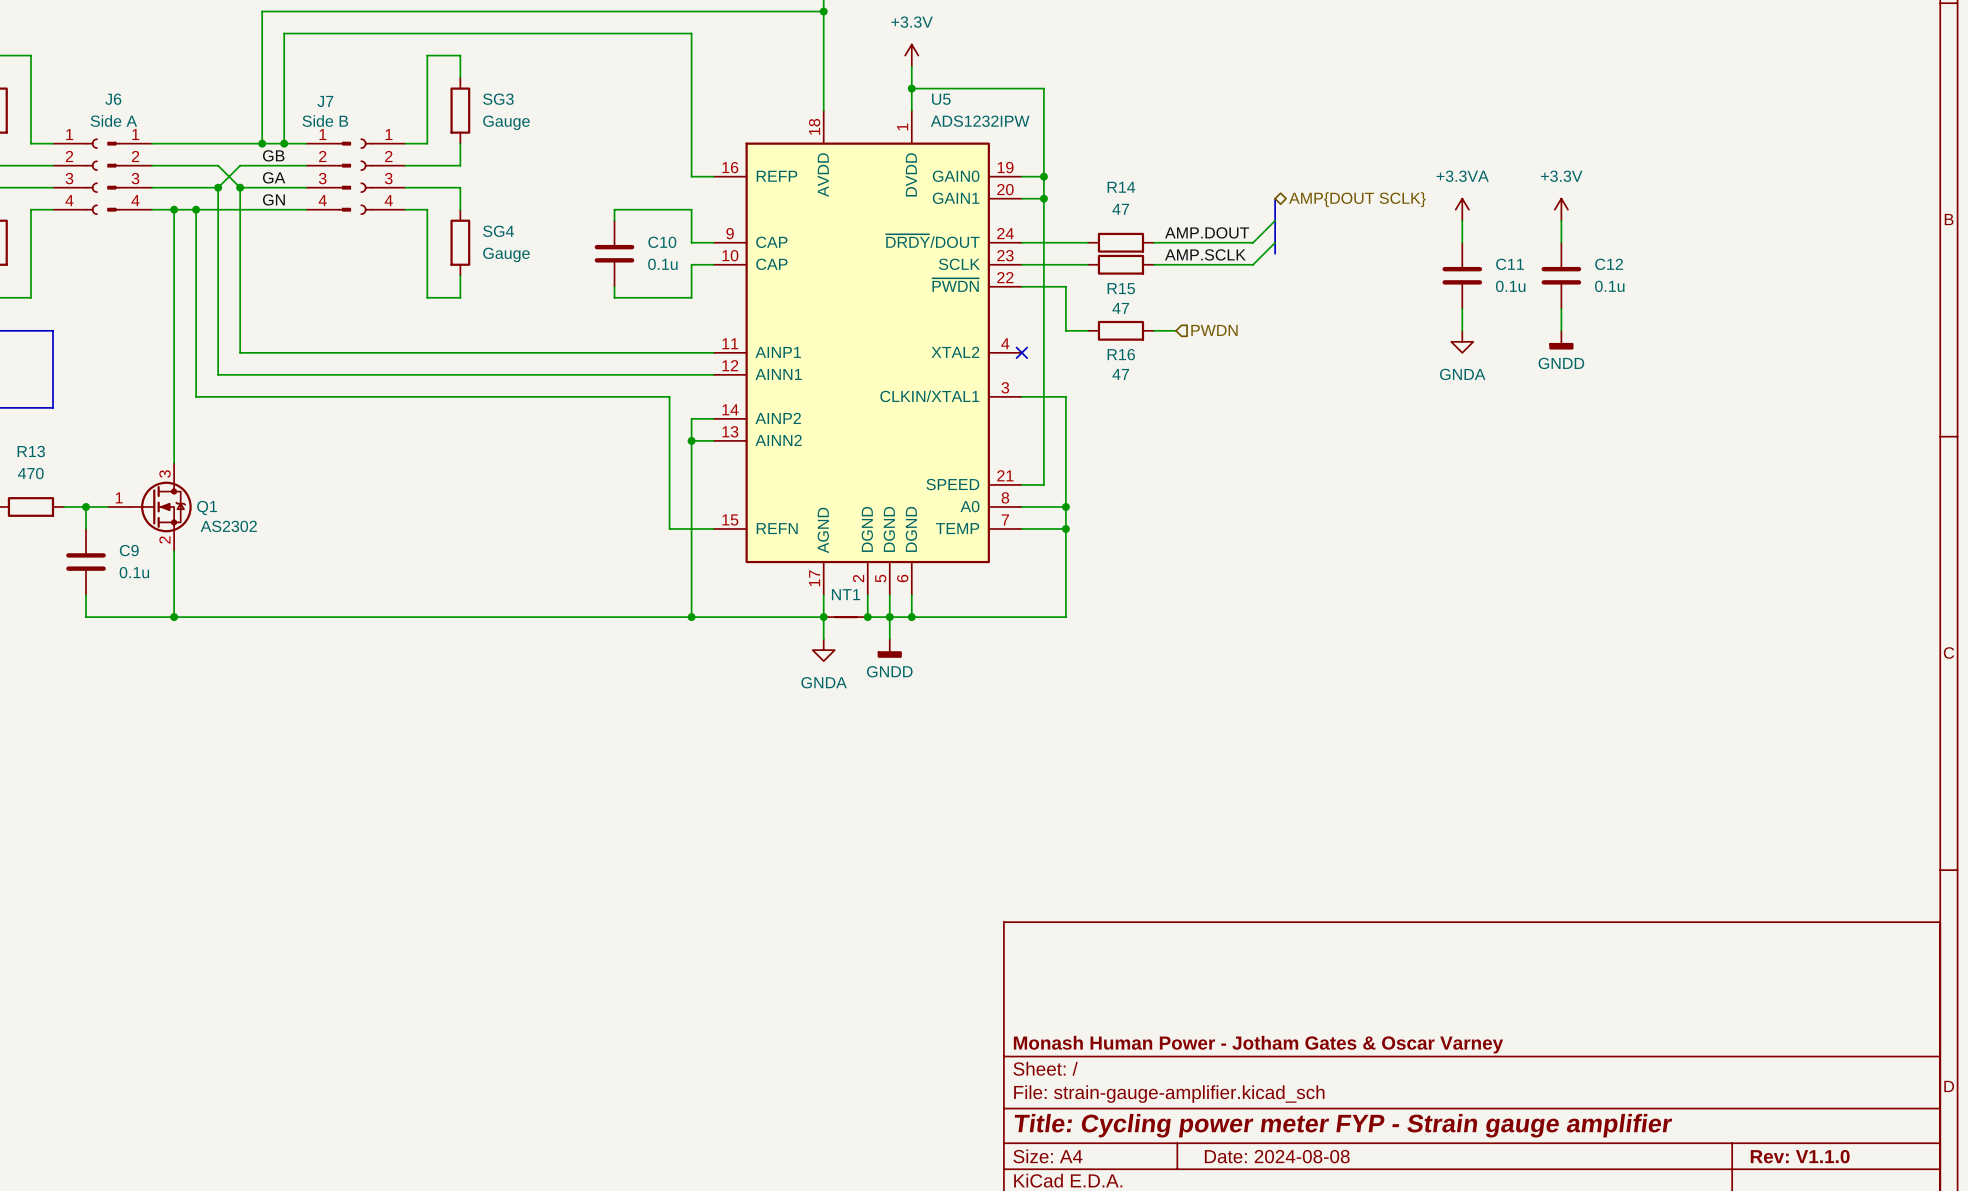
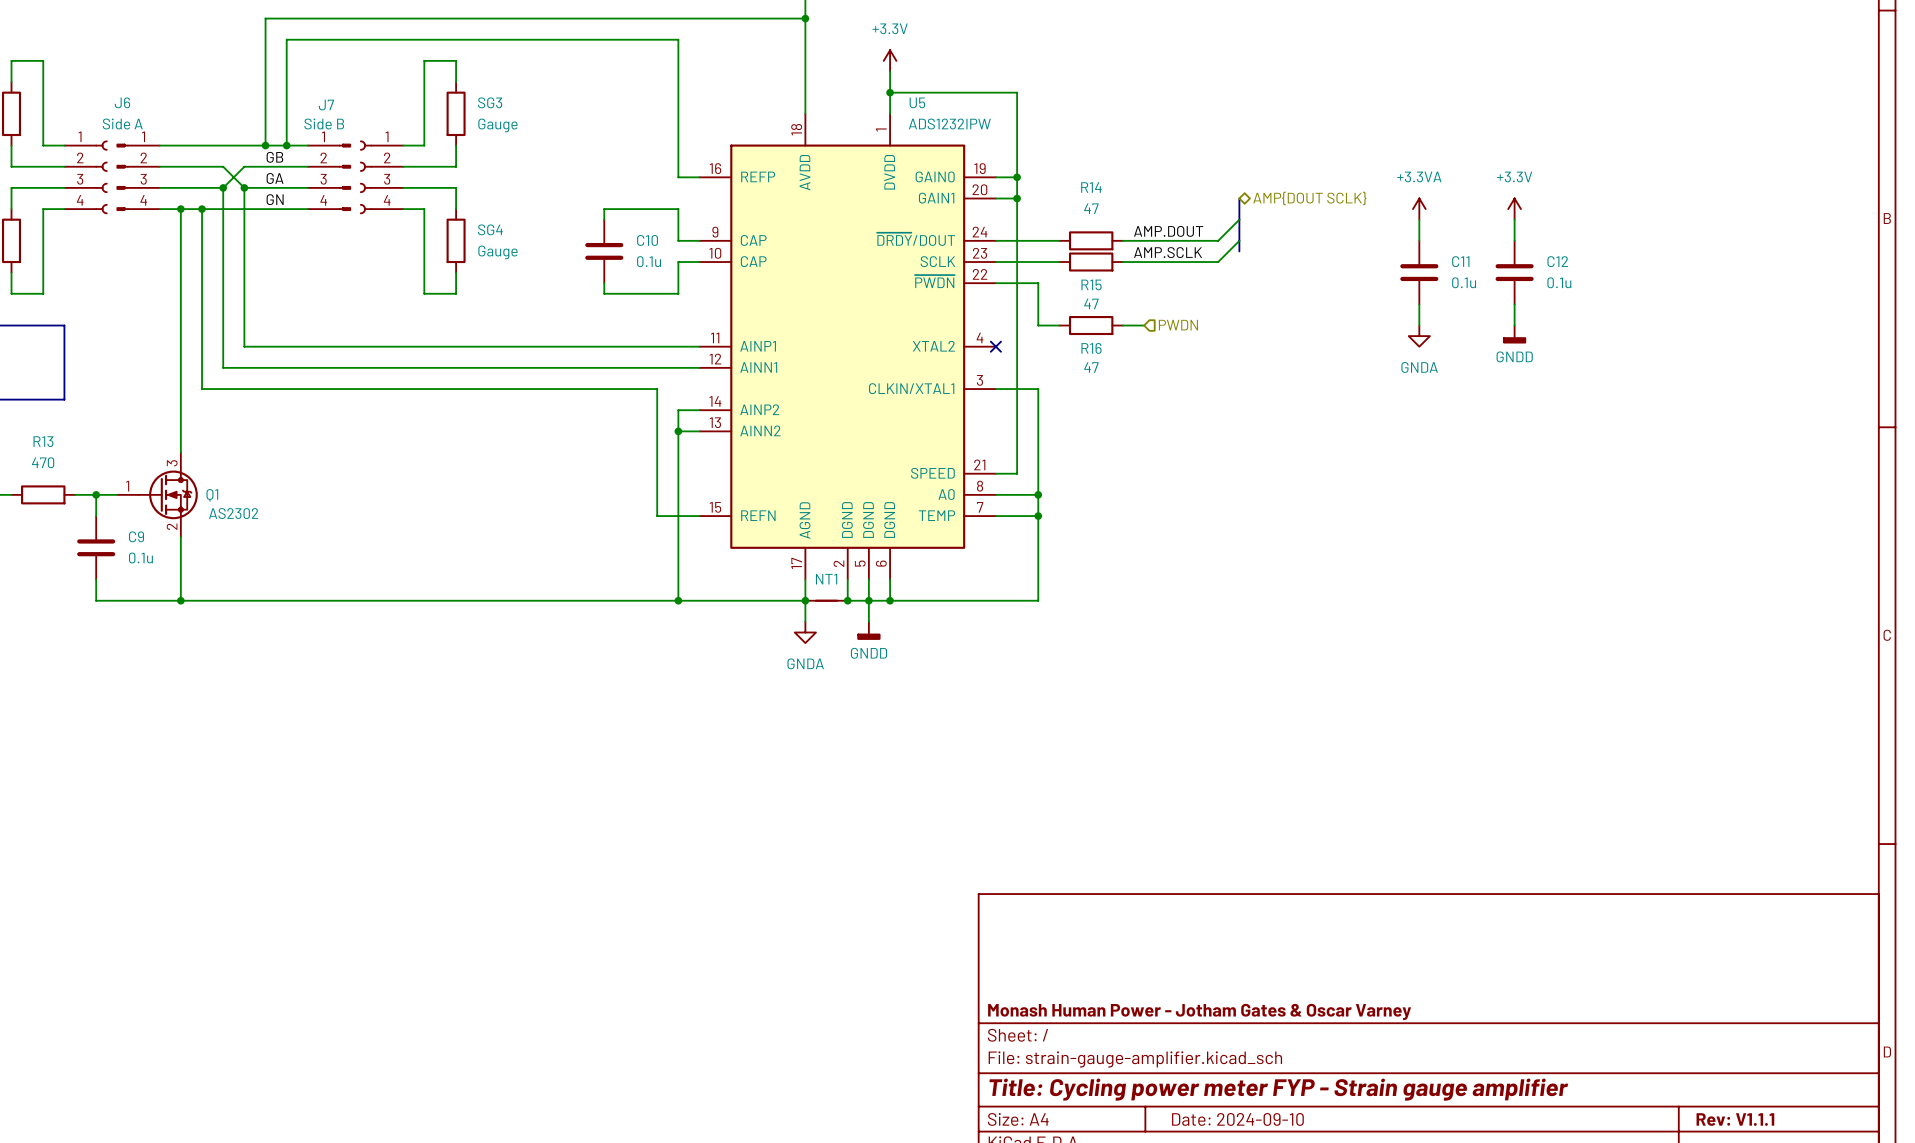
title block: Date: 2024-08-08 (1277, 1156) -> Date: 2024-09-10 (1237, 1119)
title block: Rev: V1.1.0 (1800, 1156) -> Rev: V1.1.1 (1735, 1119)

